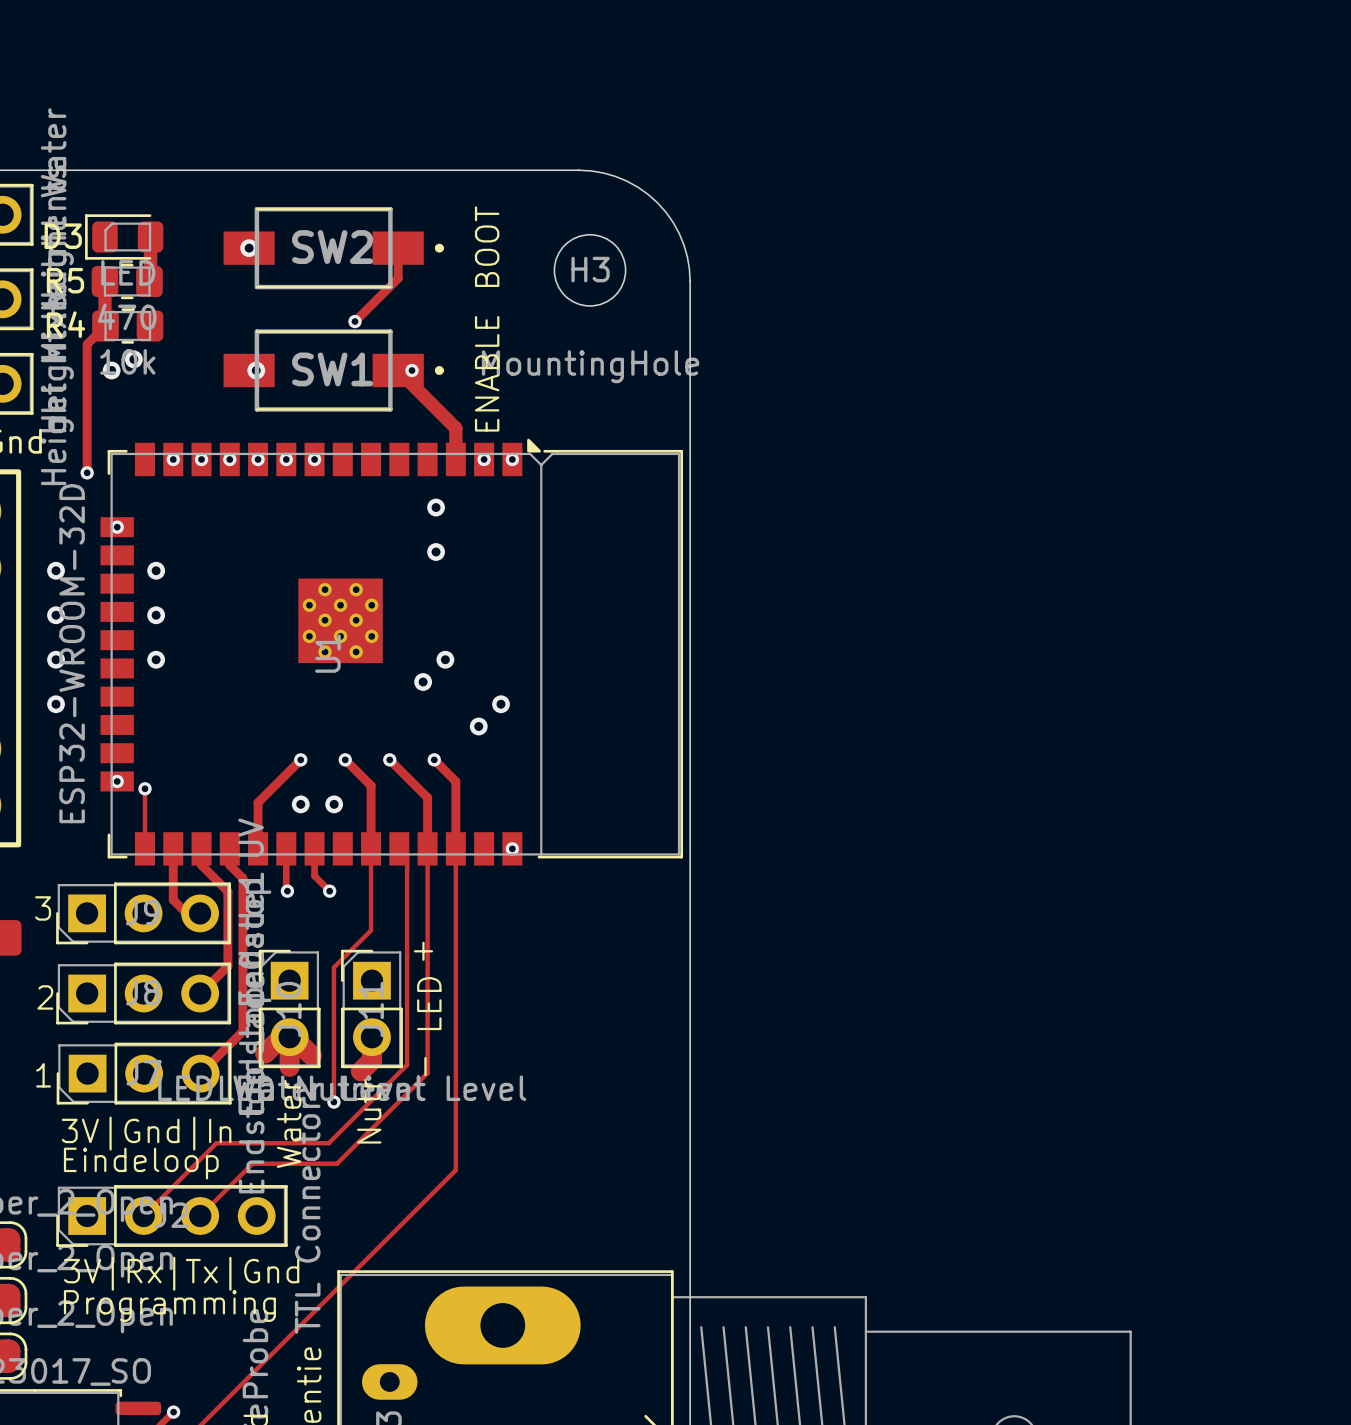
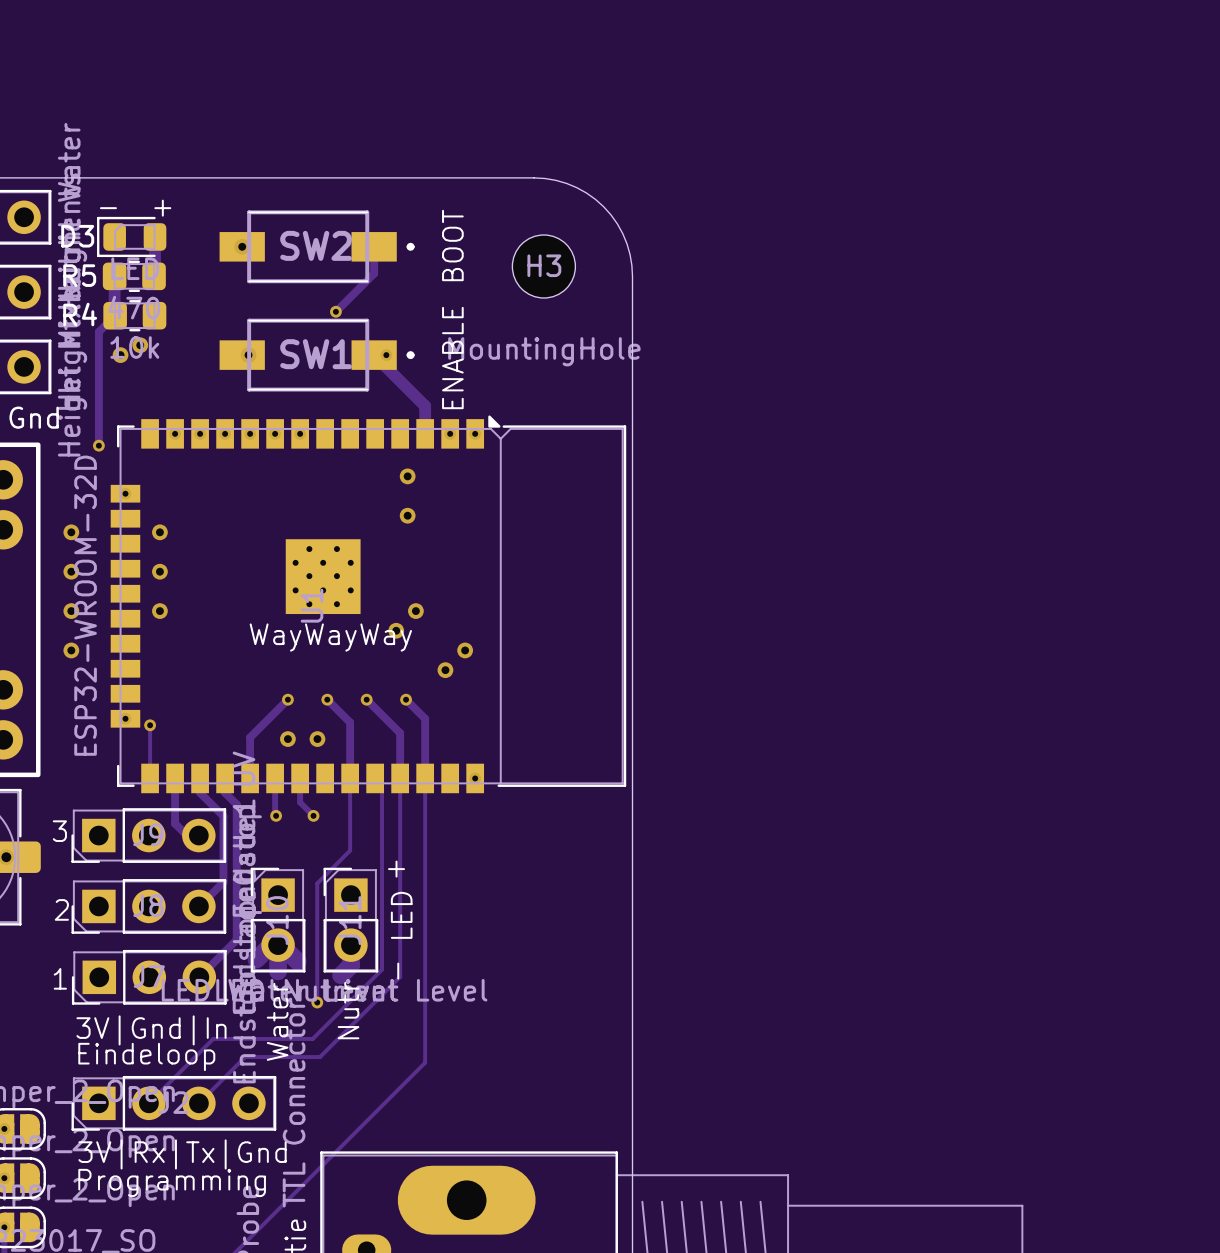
text: none -> - + (135, 208)
text: none -> WayWayWay (330, 637)

